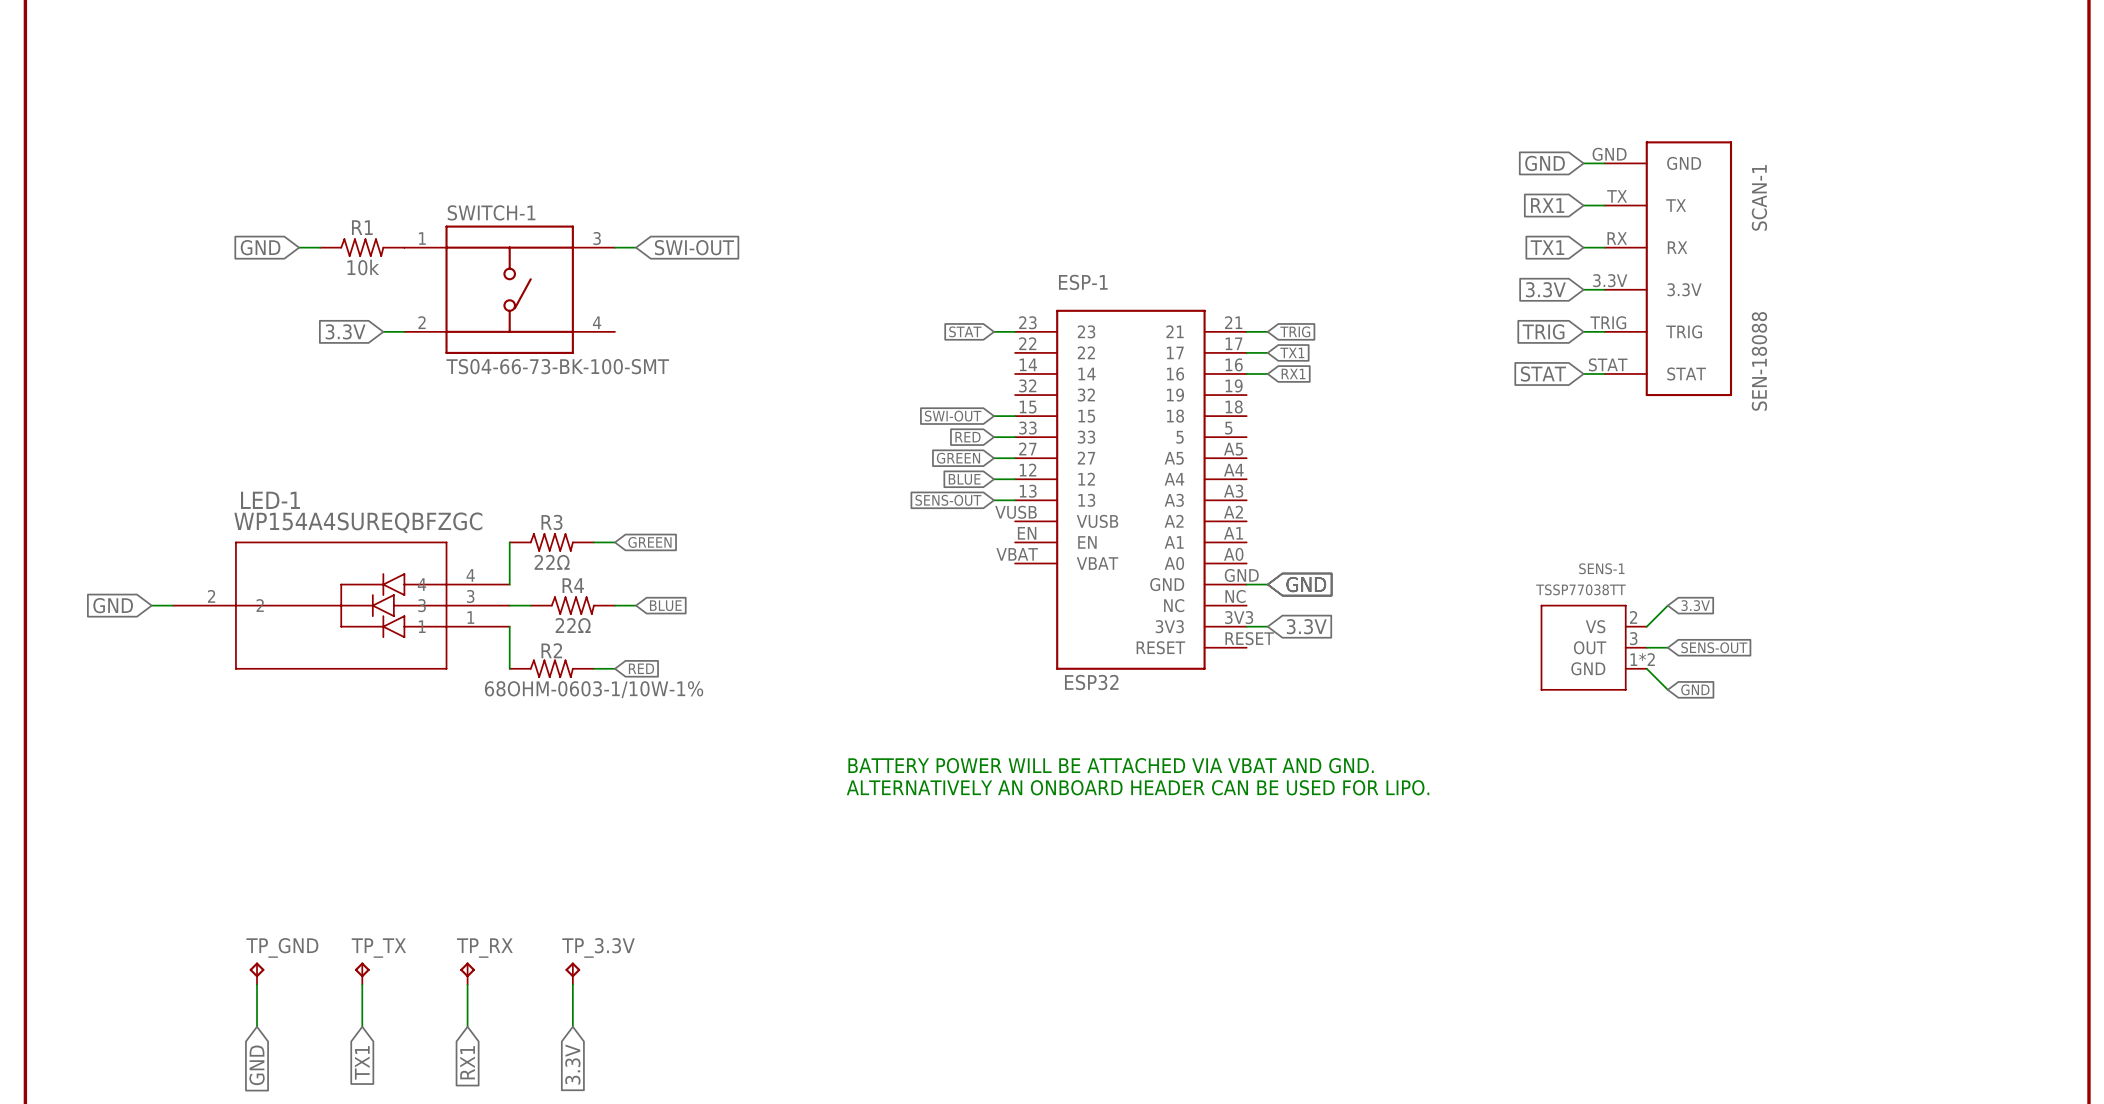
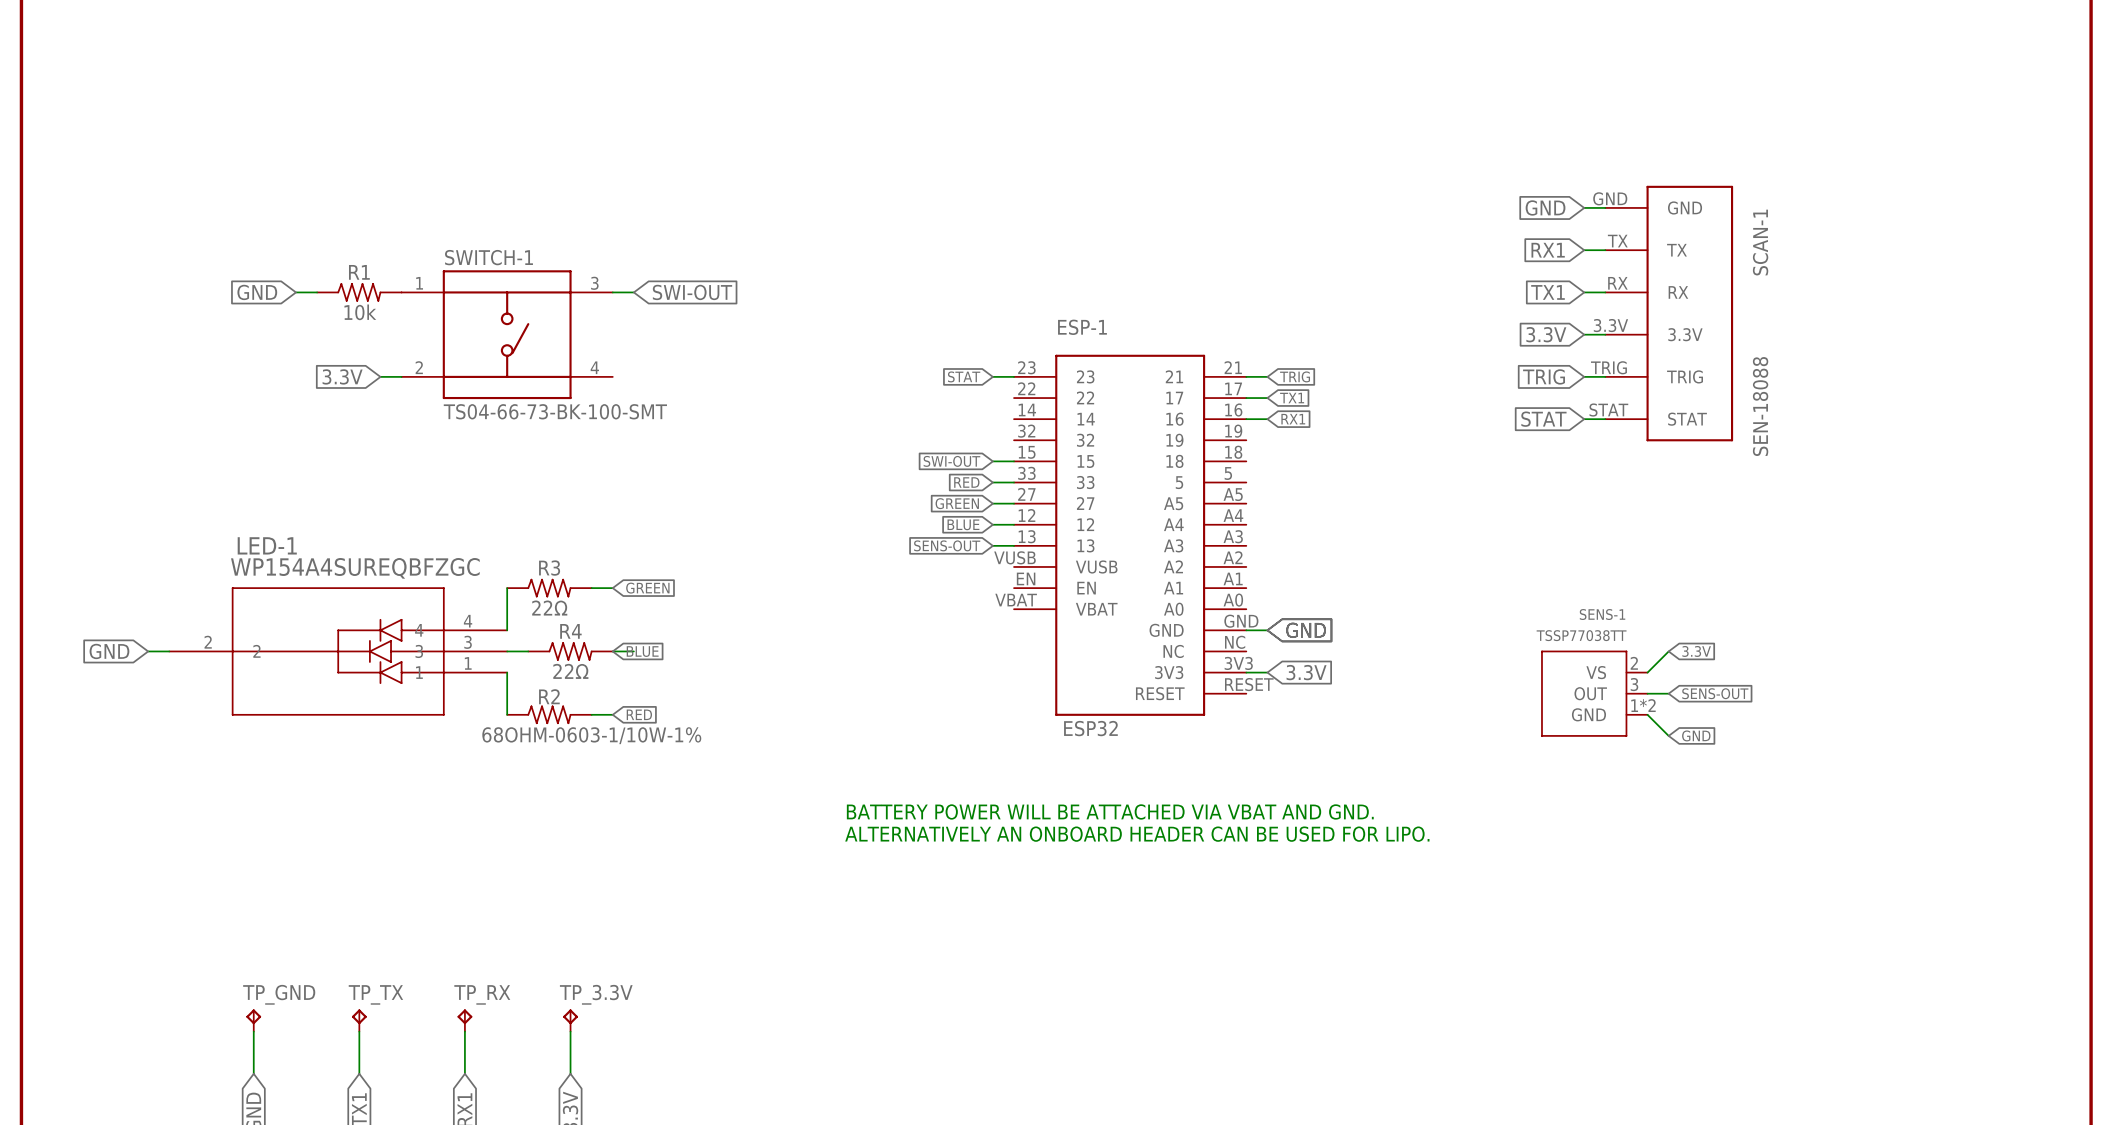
global label position: BLUE (665, 605) -> BLUE (642, 651)

